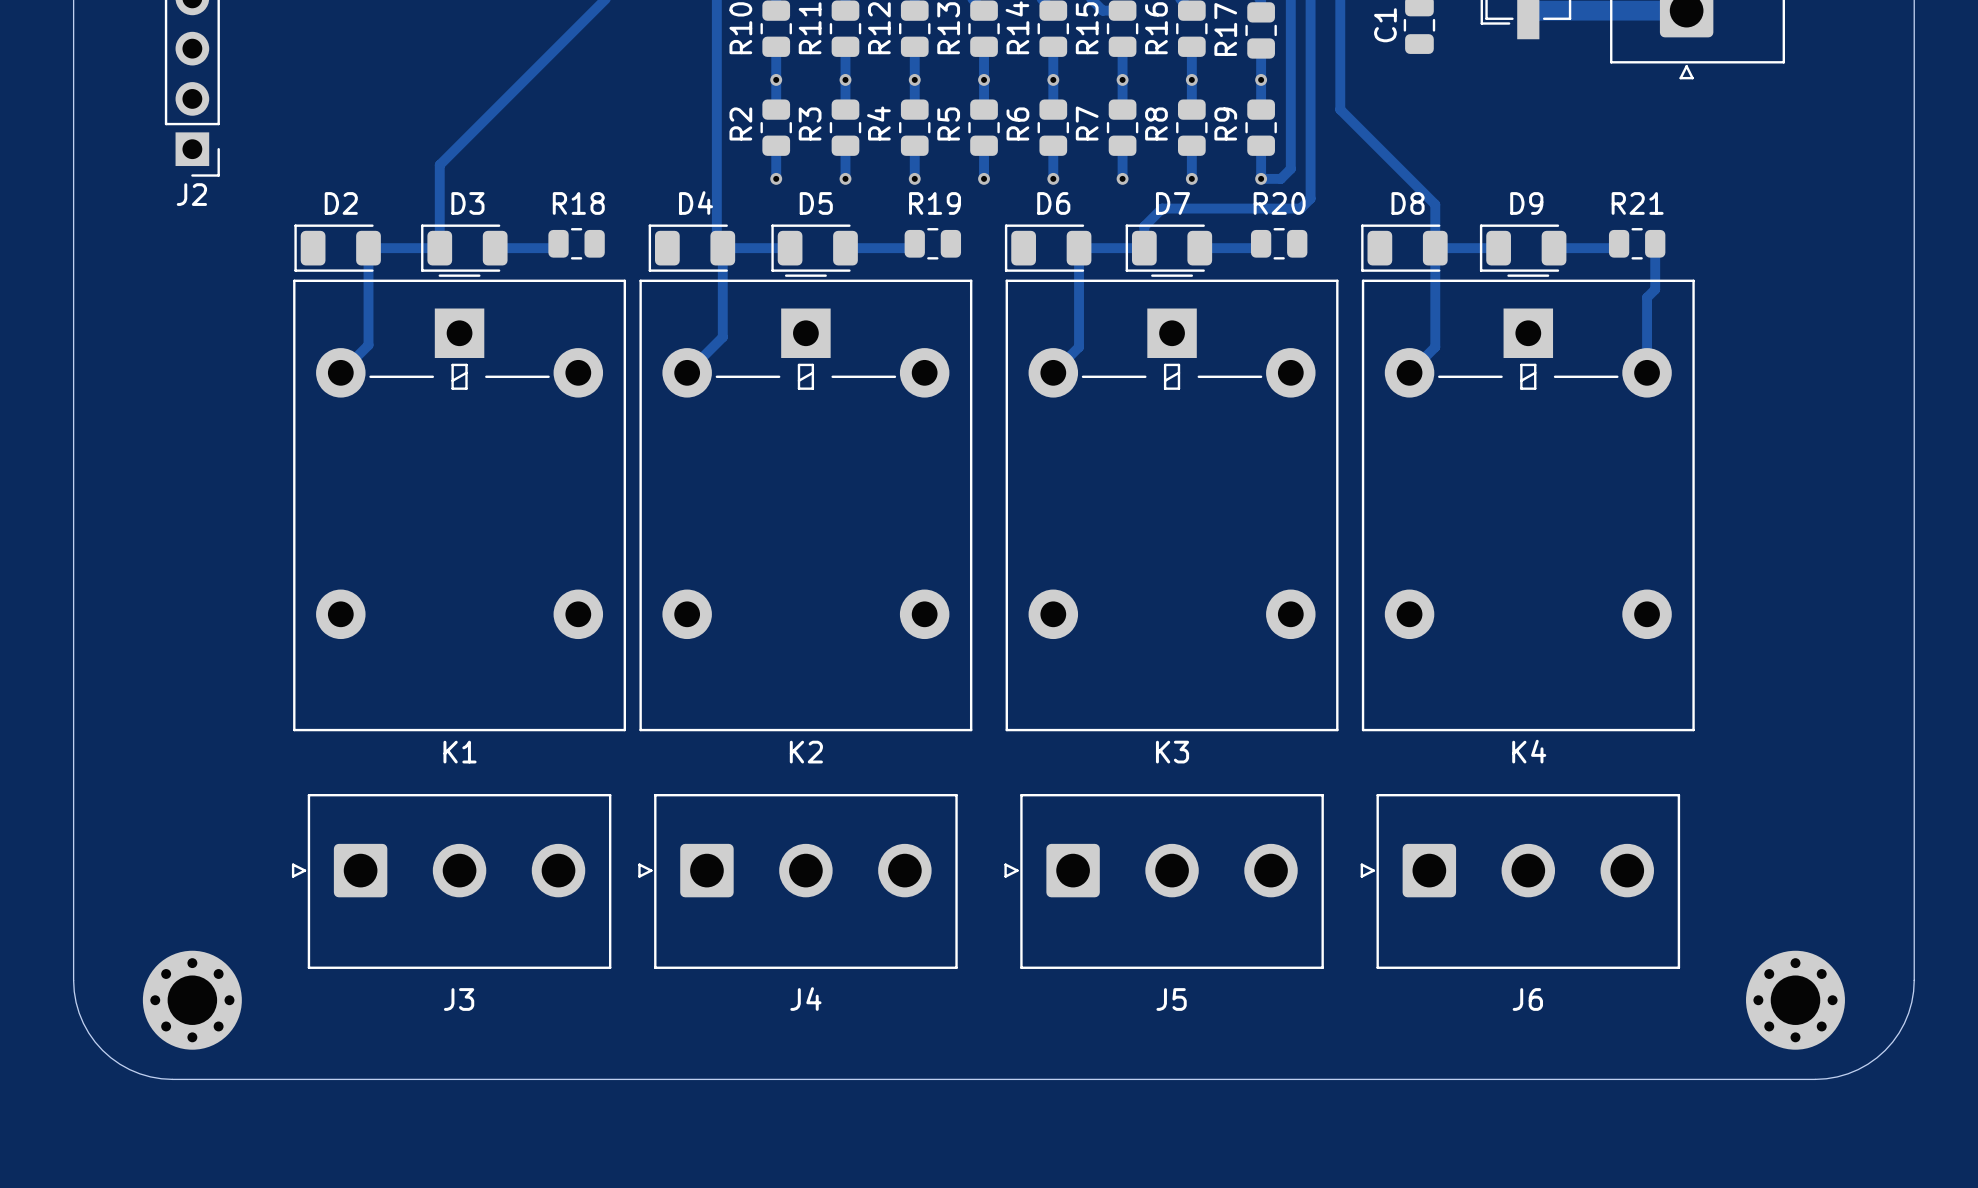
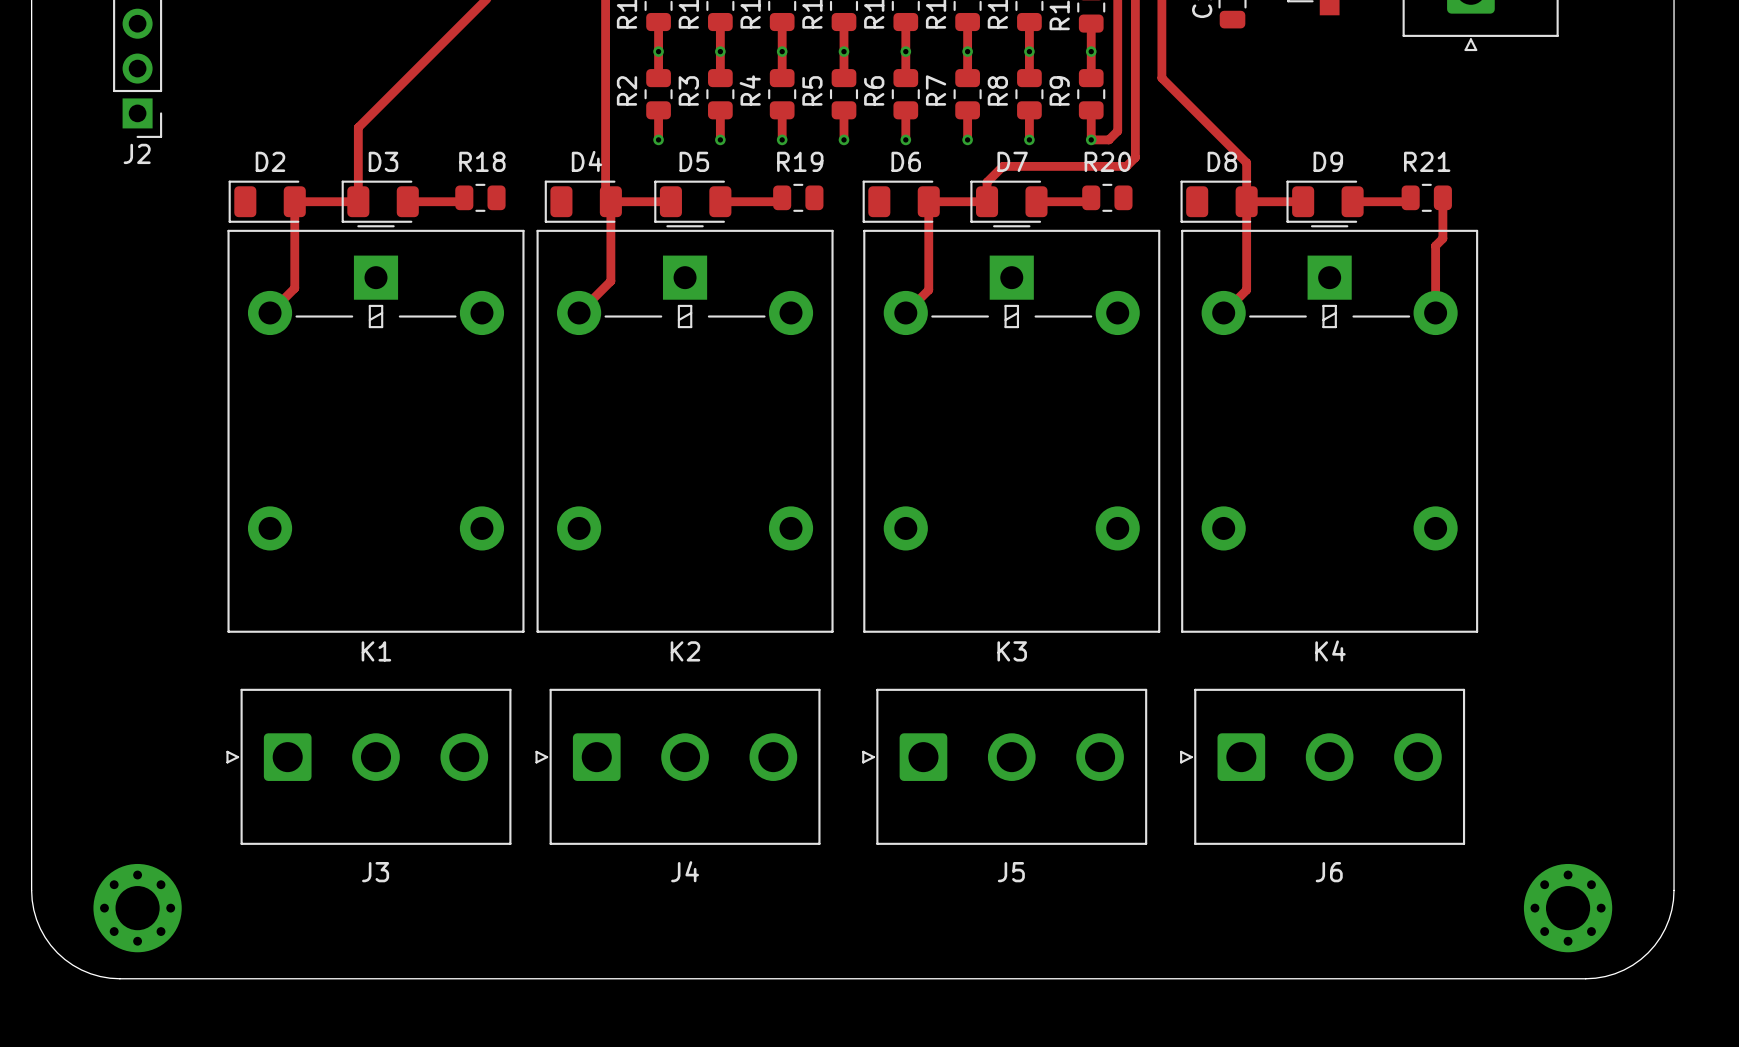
board edge: (73, 980) (76, 1002) (83, 1023) (102, 1050) (119, 1064) (139, 1073) (172, 1079) (1826, 1078) (1858, 1069) (1885, 1050) (1899, 1033) (1908, 1013) (1914, 980) -> (31, 855) (33, 910) (40, 928) (50, 945) (64, 959) (81, 970) (100, 976) (119, 978) (1595, 978) (1614, 973) (1632, 965) (1648, 952) (1660, 937) (1669, 919) (1673, 900) (1674, 855)
part position: (192, 1000) -> (137, 908)
part position: (1795, 1000) -> (1568, 908)

